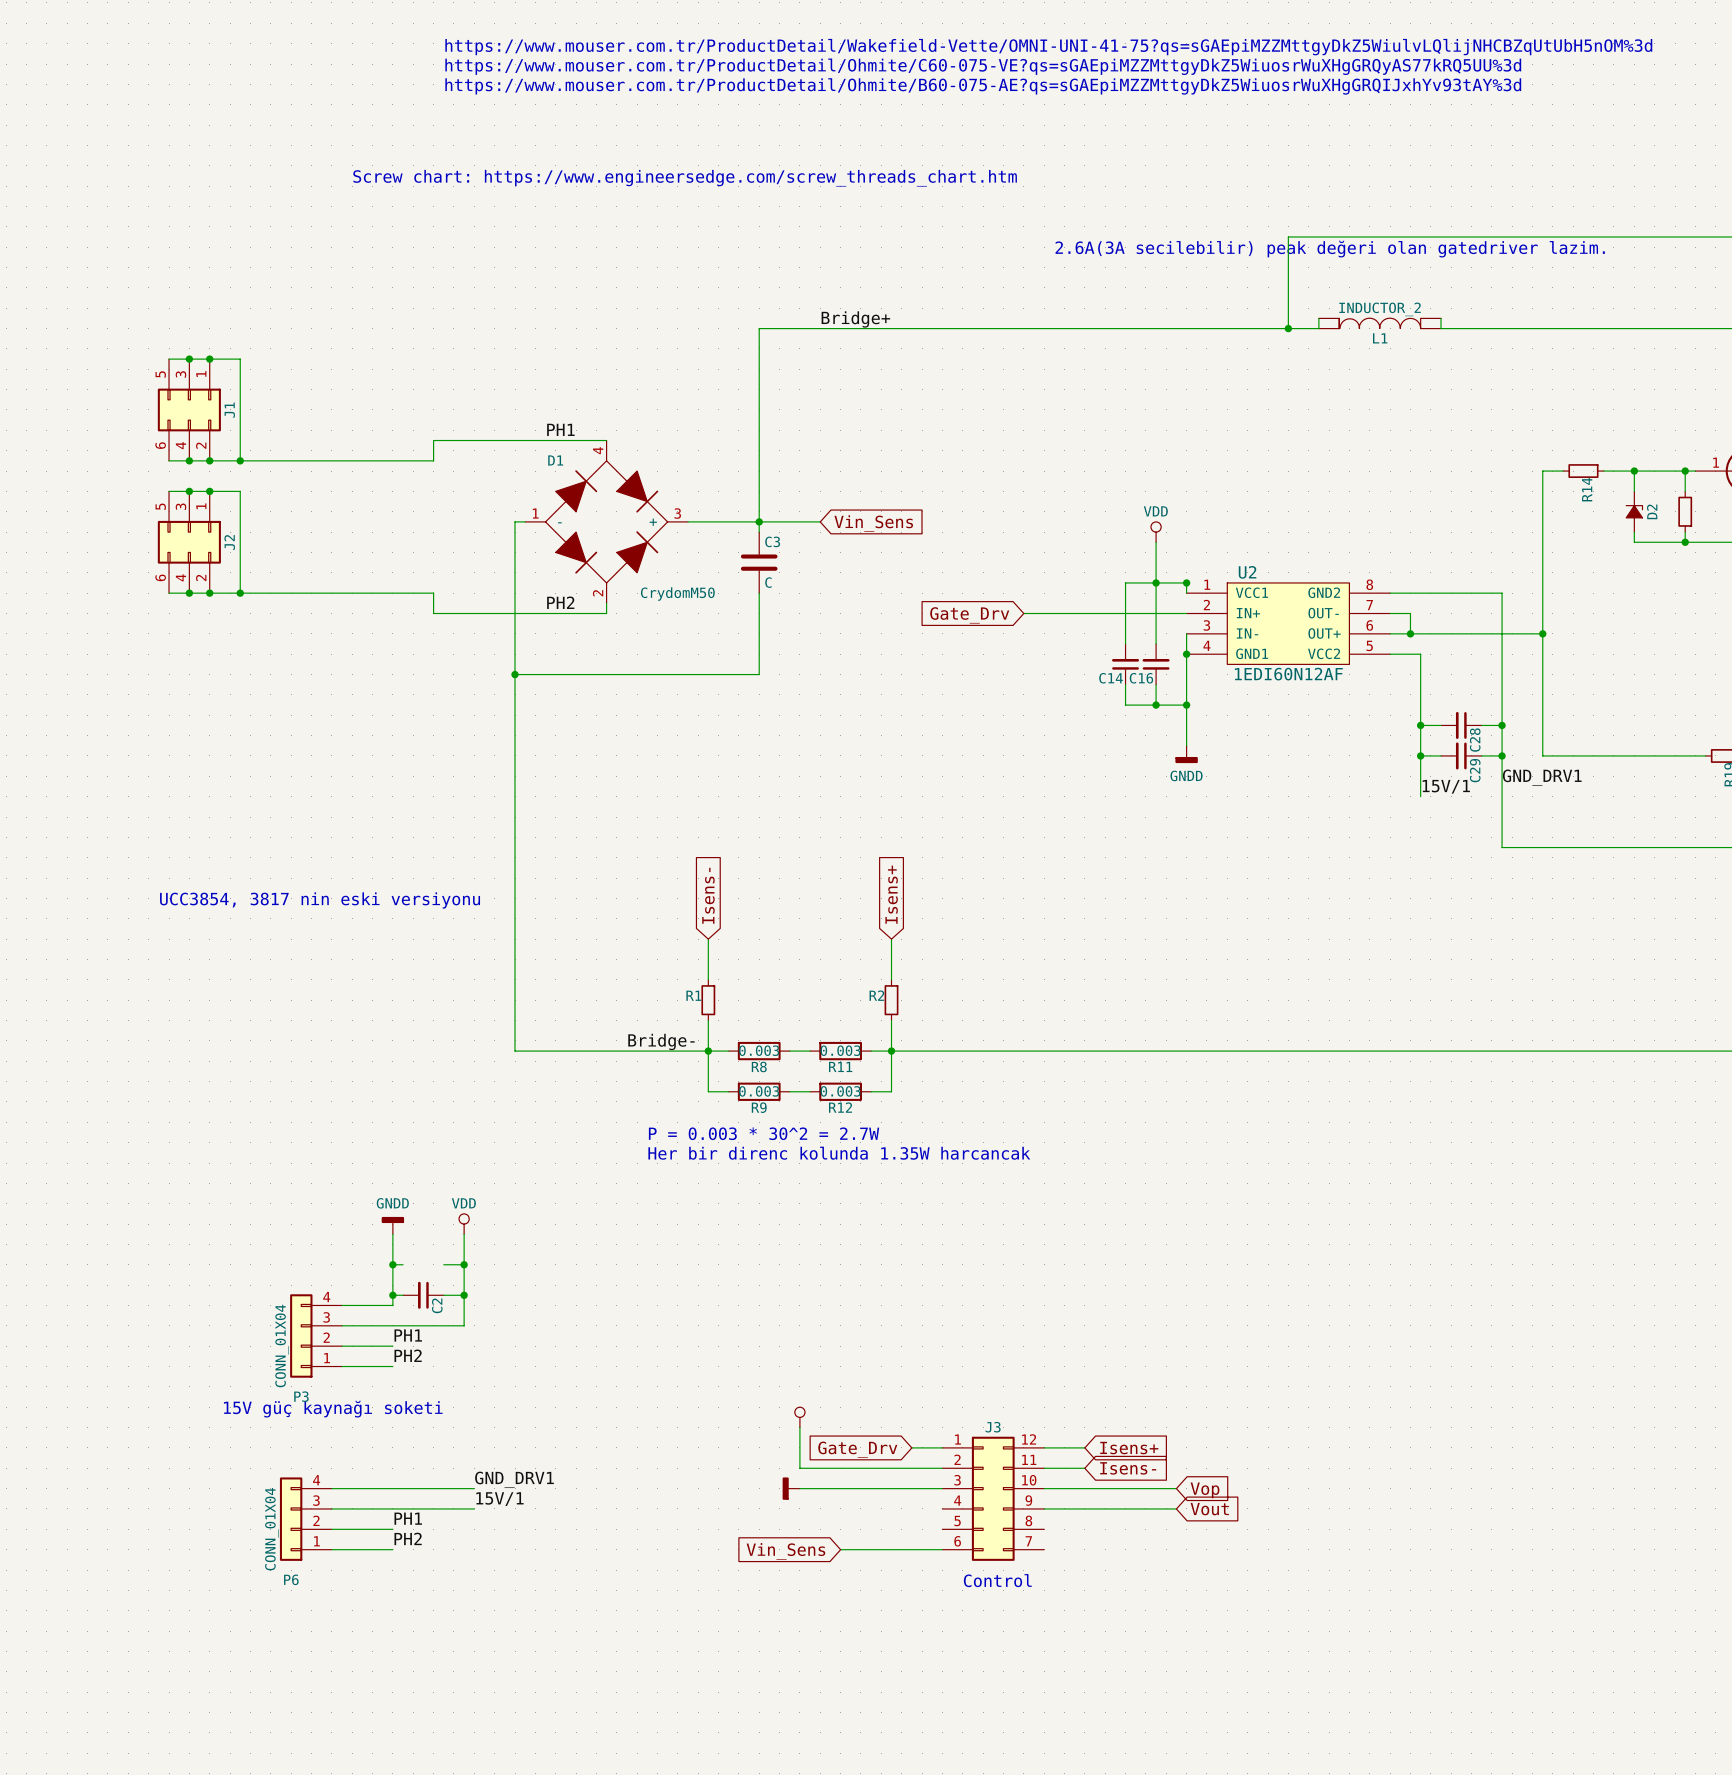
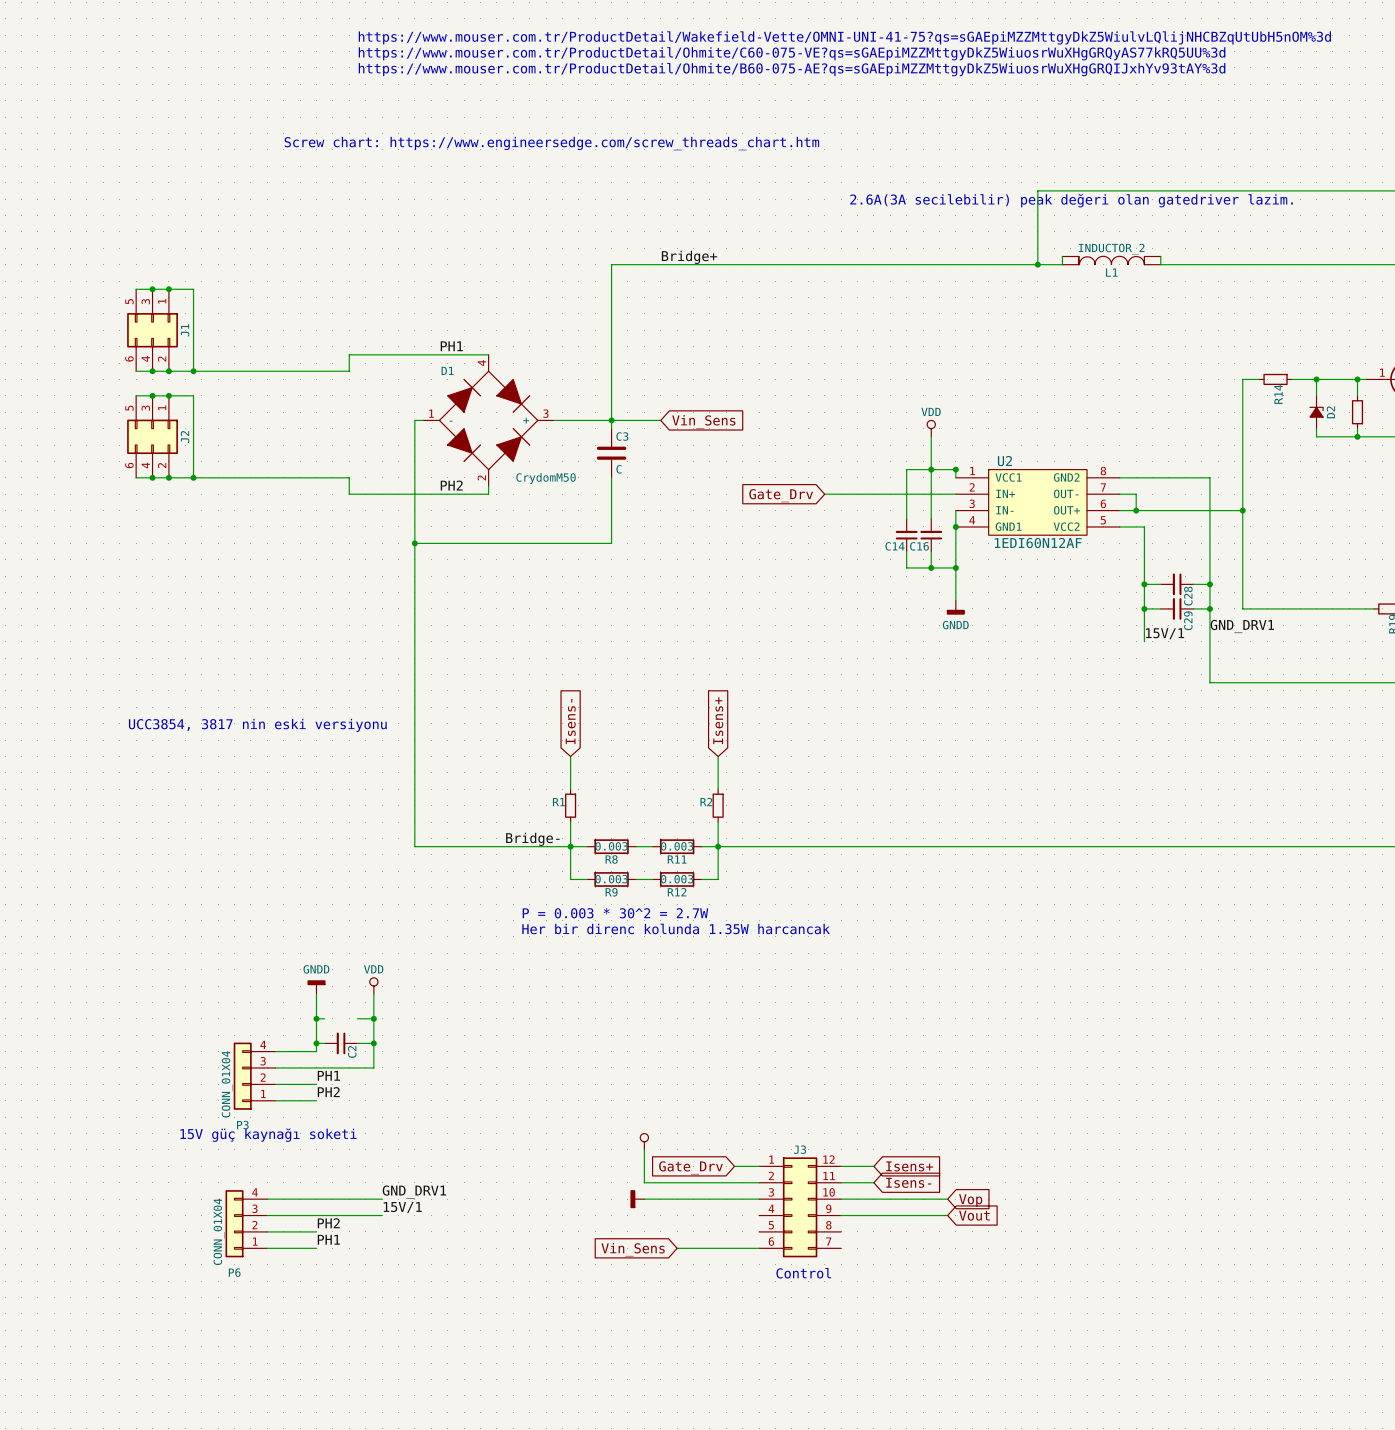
label: PH1 (408, 1518) -> PH2 (328, 1223)
label: PH2 (408, 1538) -> PH1 (328, 1239)

